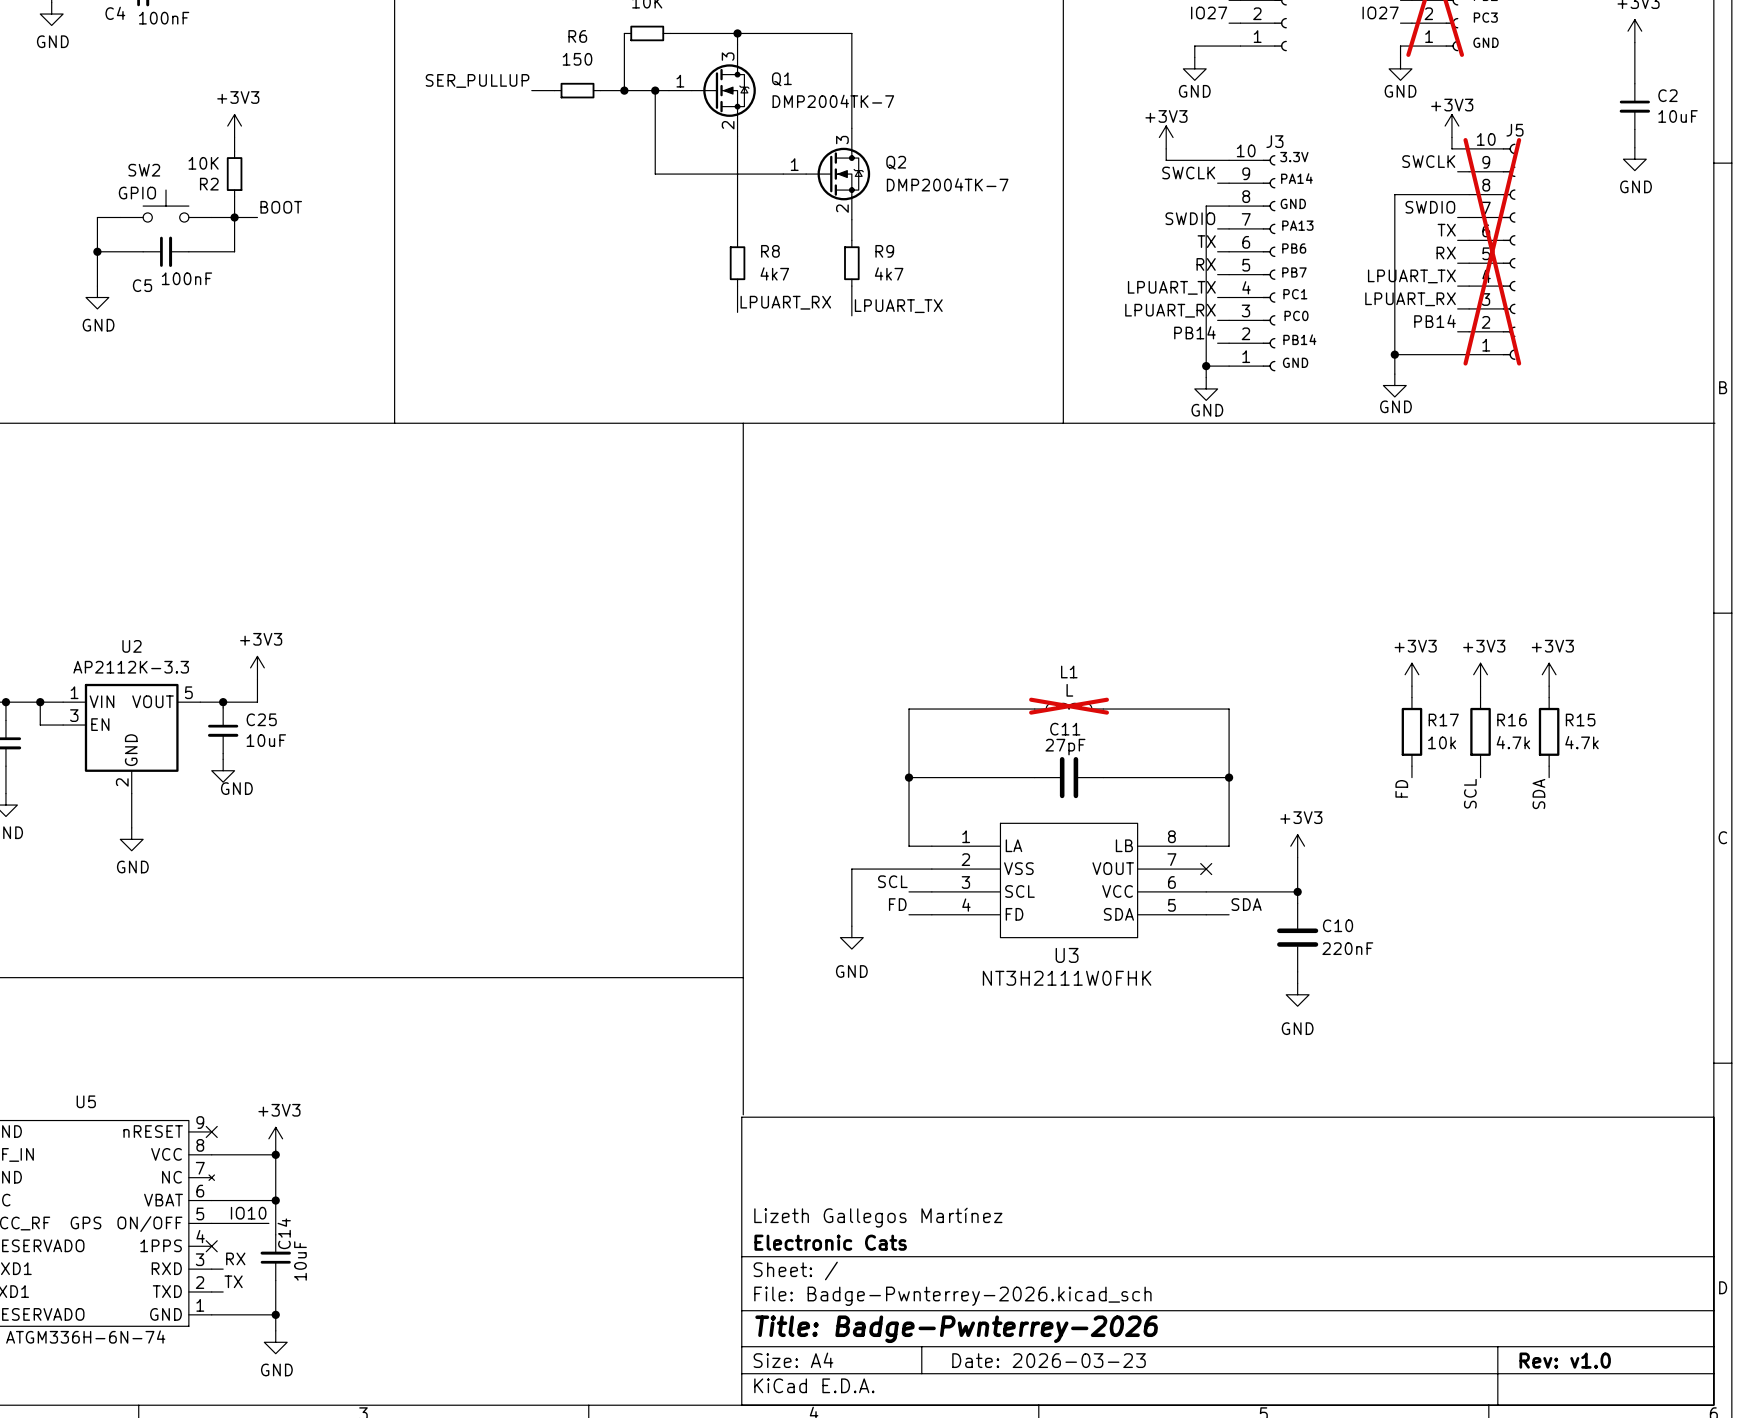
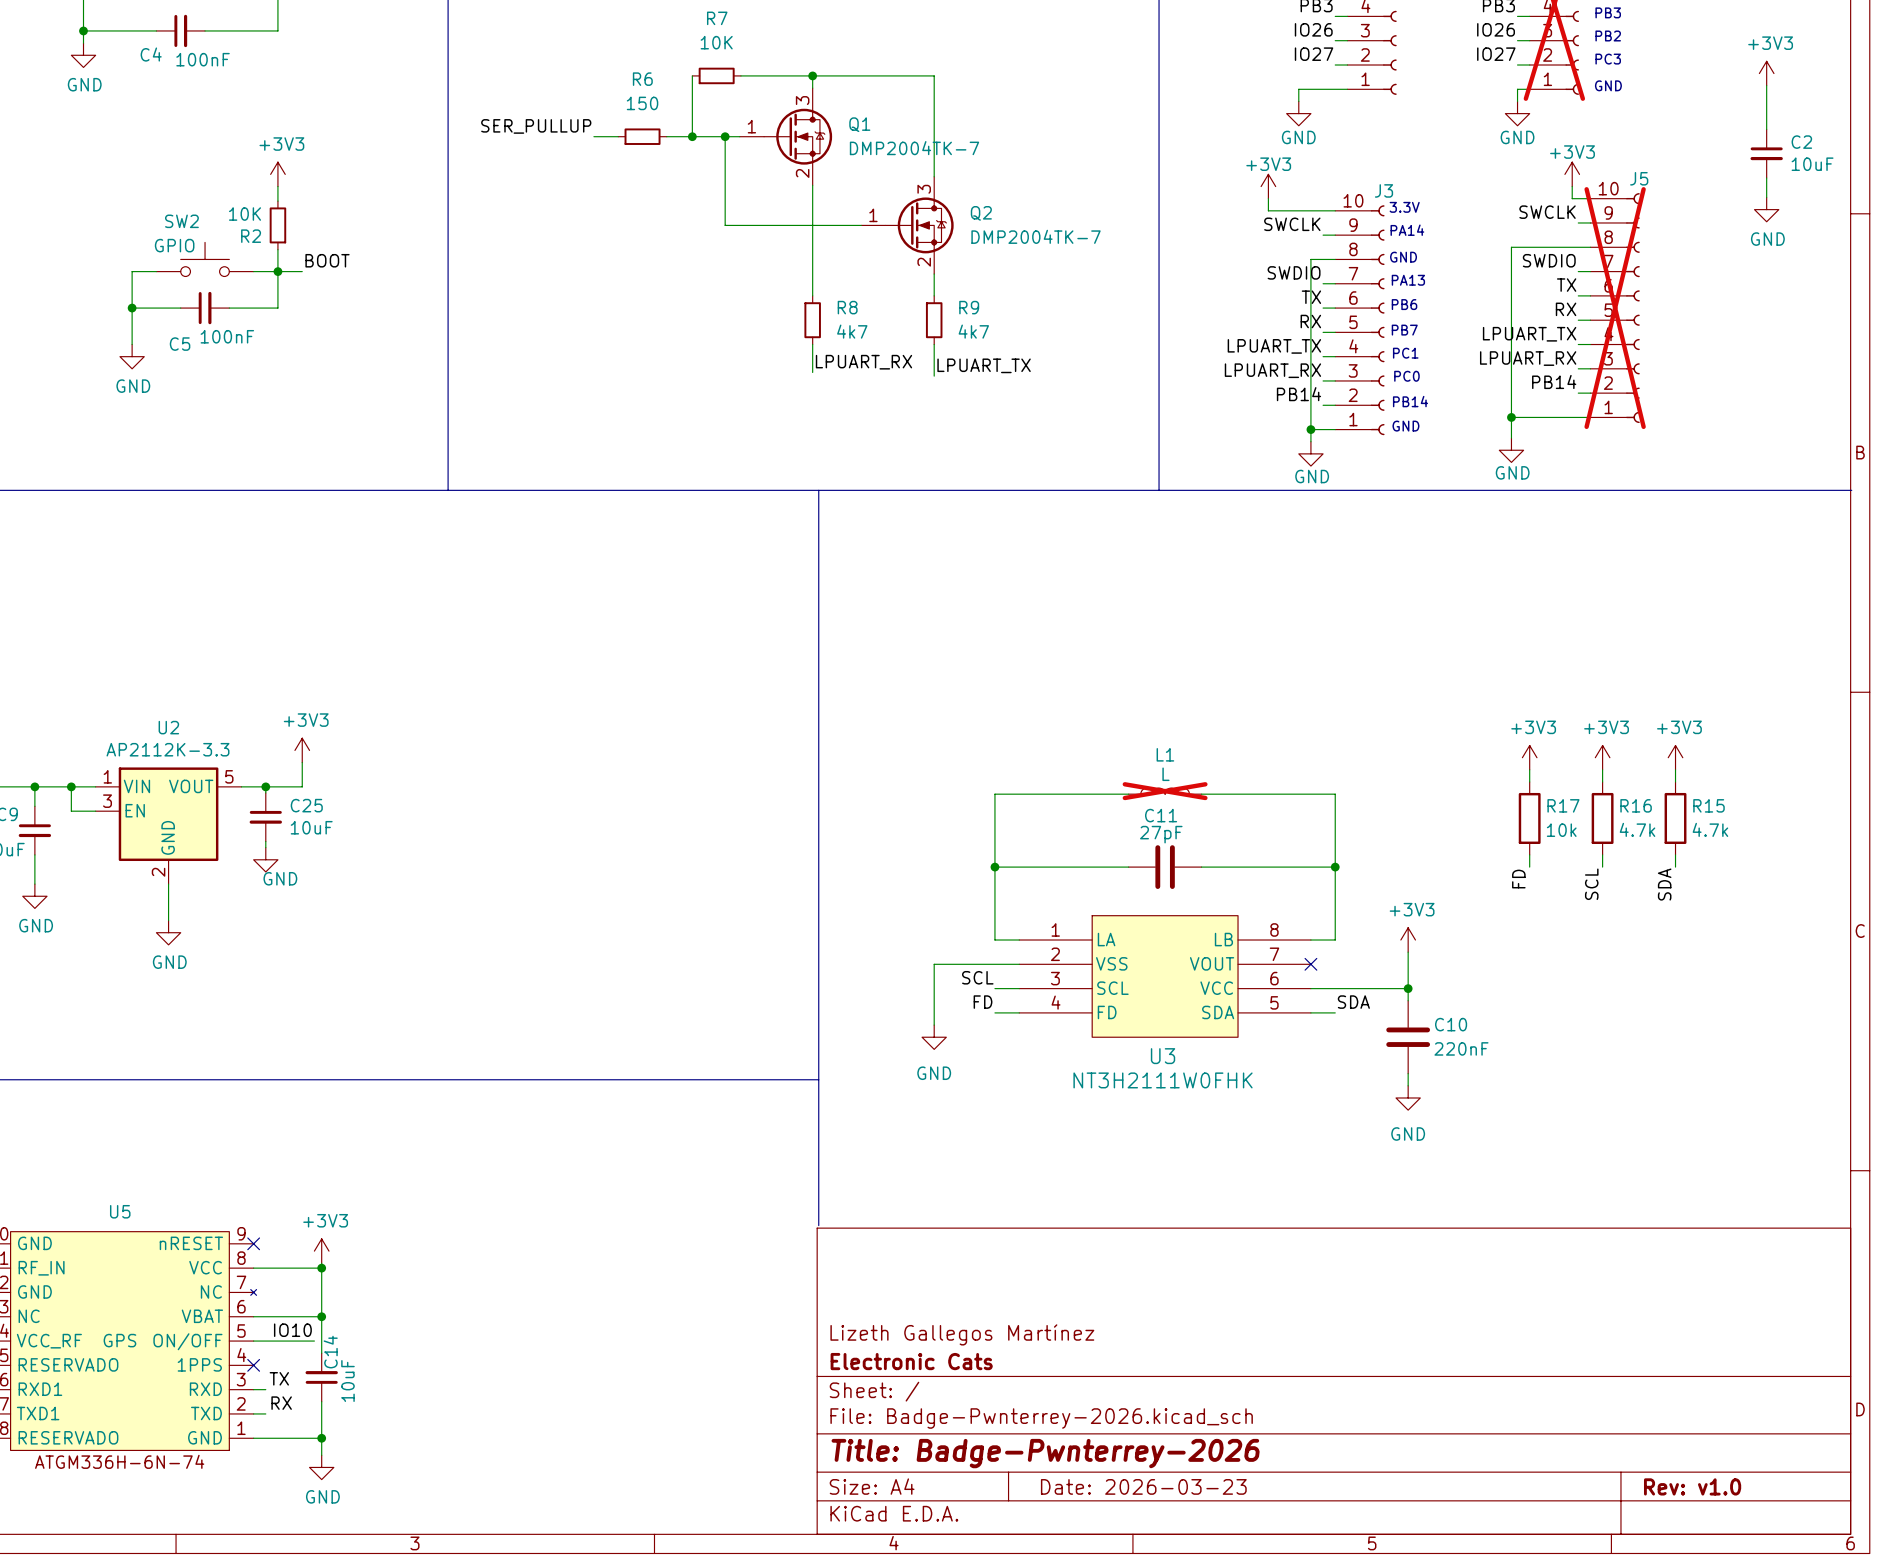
label: RX (235, 1258) -> TX (279, 1378)
label: TX (233, 1281) -> RX (281, 1403)

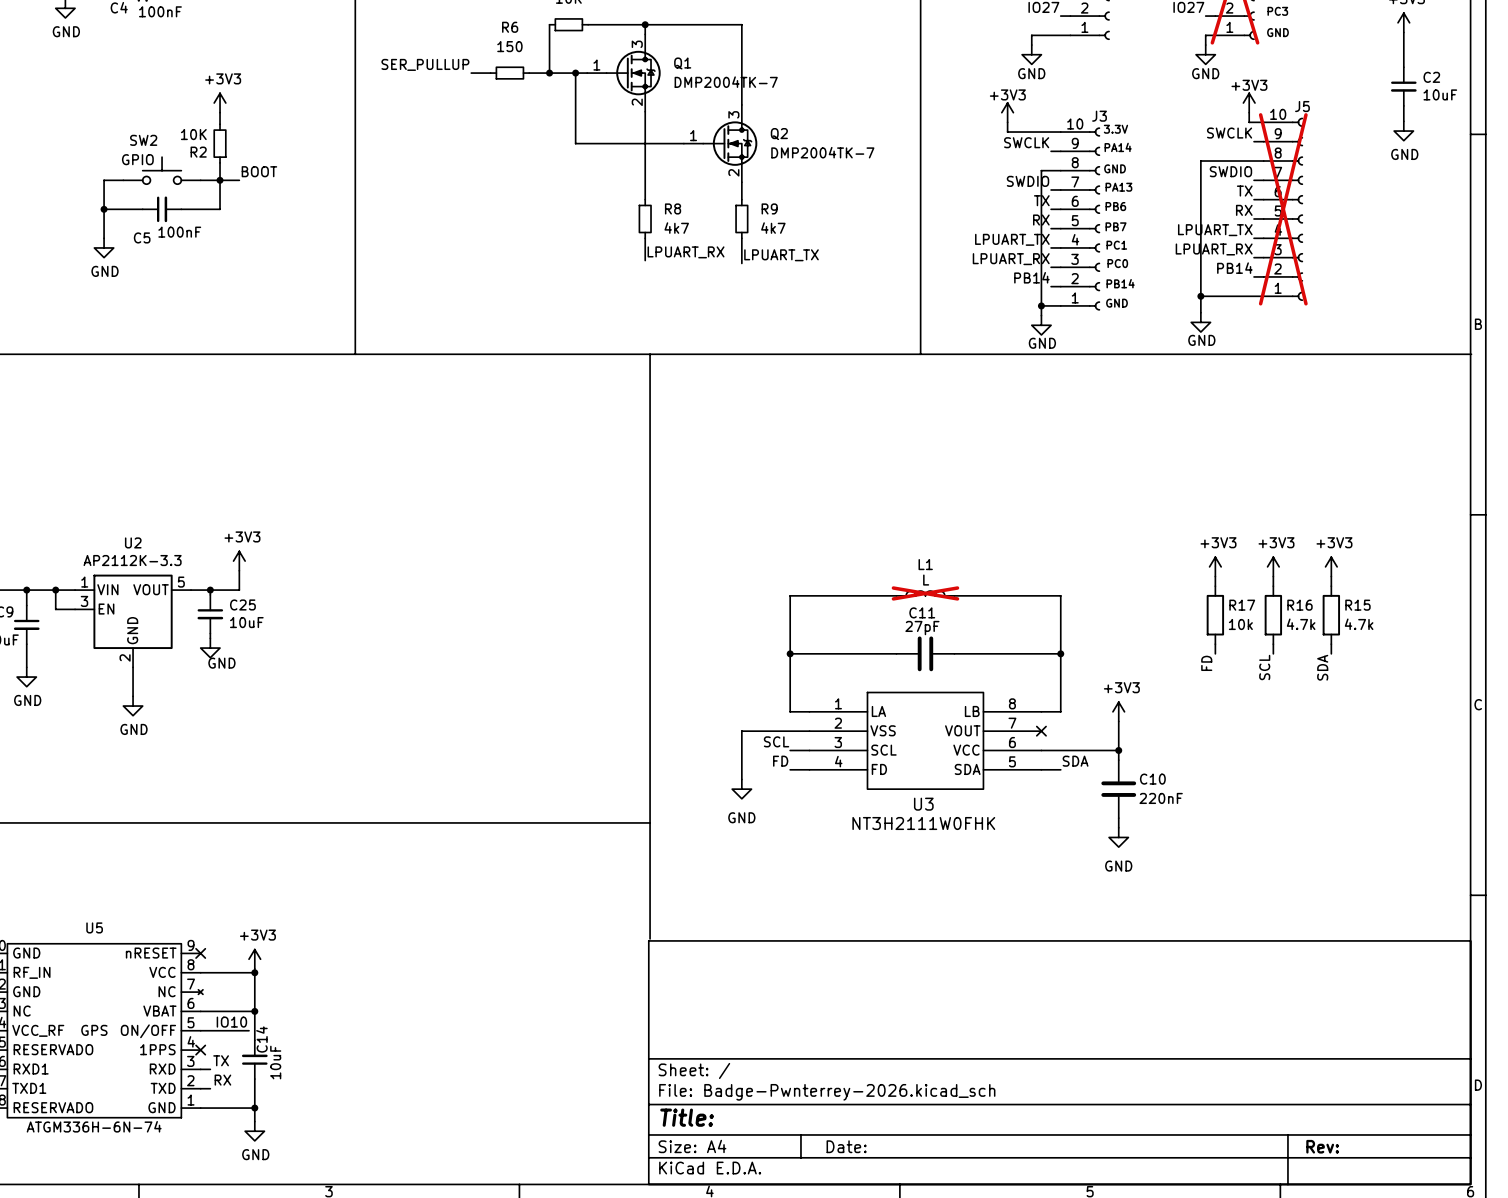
title block: Lizeth Gallegos Martínez (962, 1334) -> none
title block: Electronic Cats (911, 1361) -> none
title block: Title: Badge-Pwnterrey-2026 (1045, 1453) -> Title: (687, 1117)
title block: Date: 2026-03-23 (1143, 1486) -> Date: (846, 1146)
title block: Rev: v1.0 (1692, 1486) -> Rev: (1322, 1146)

